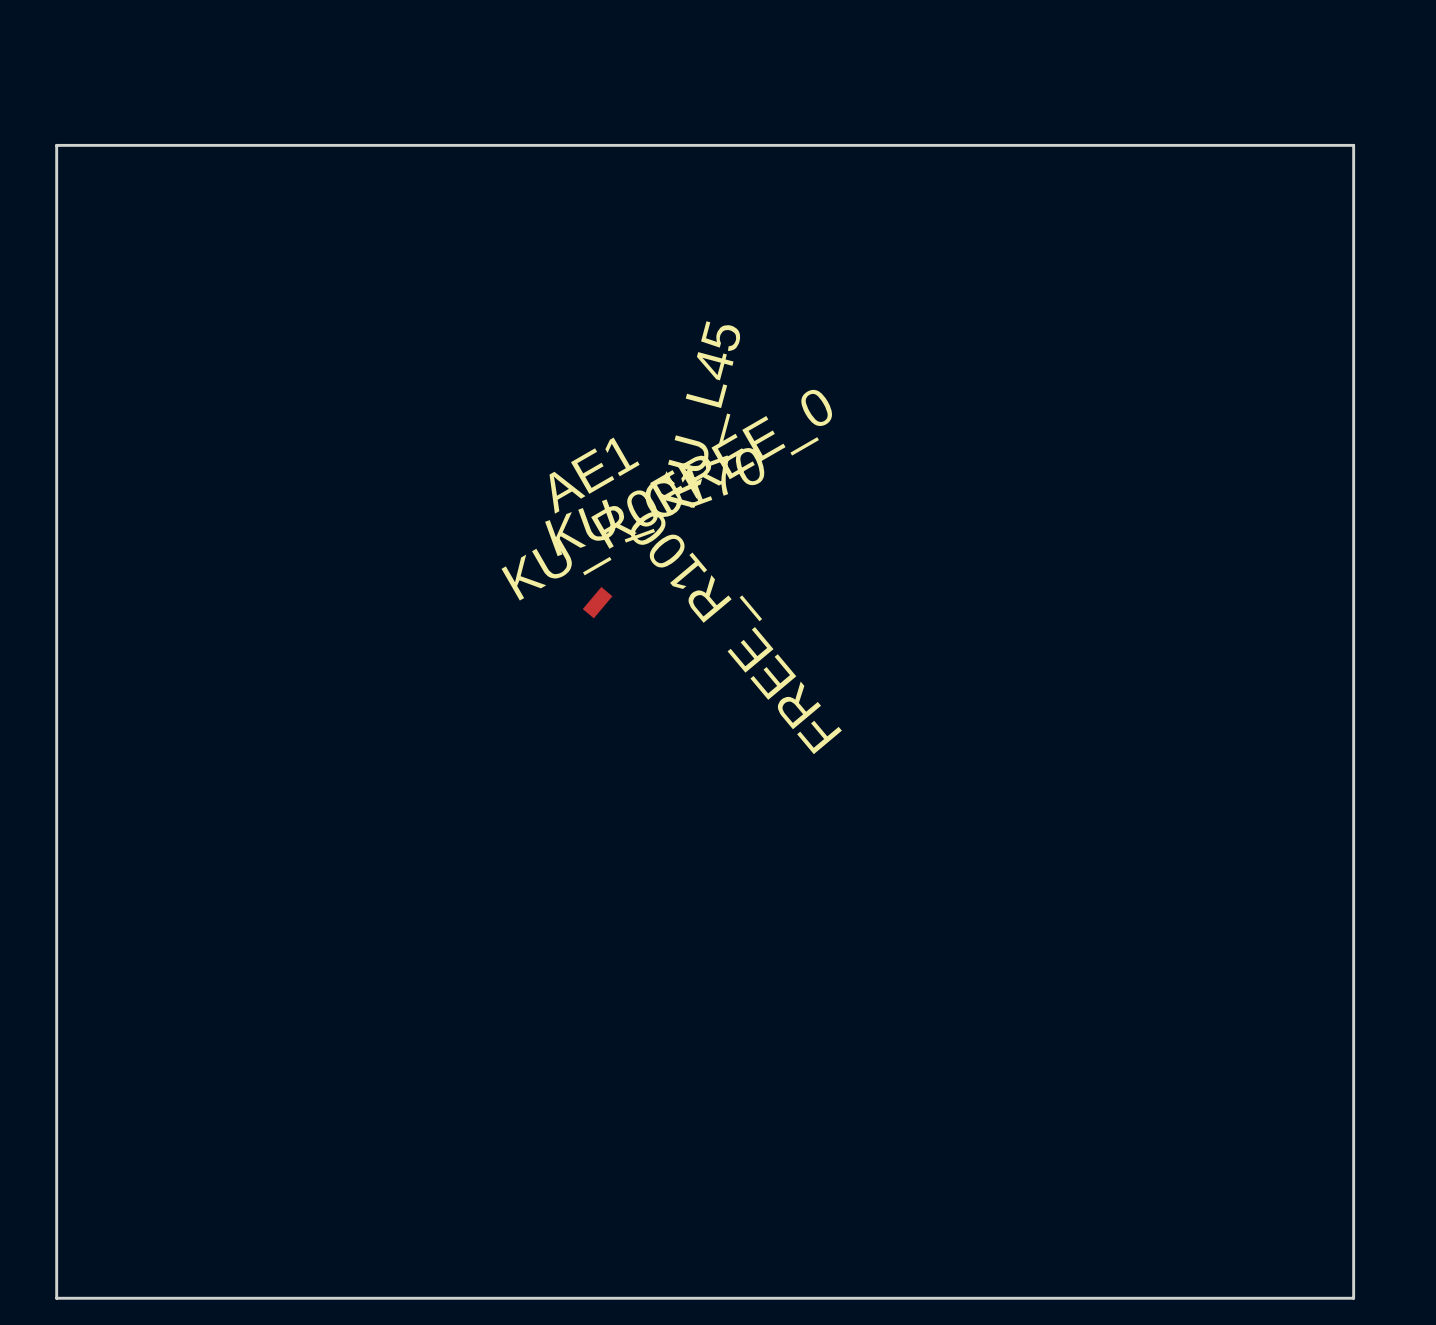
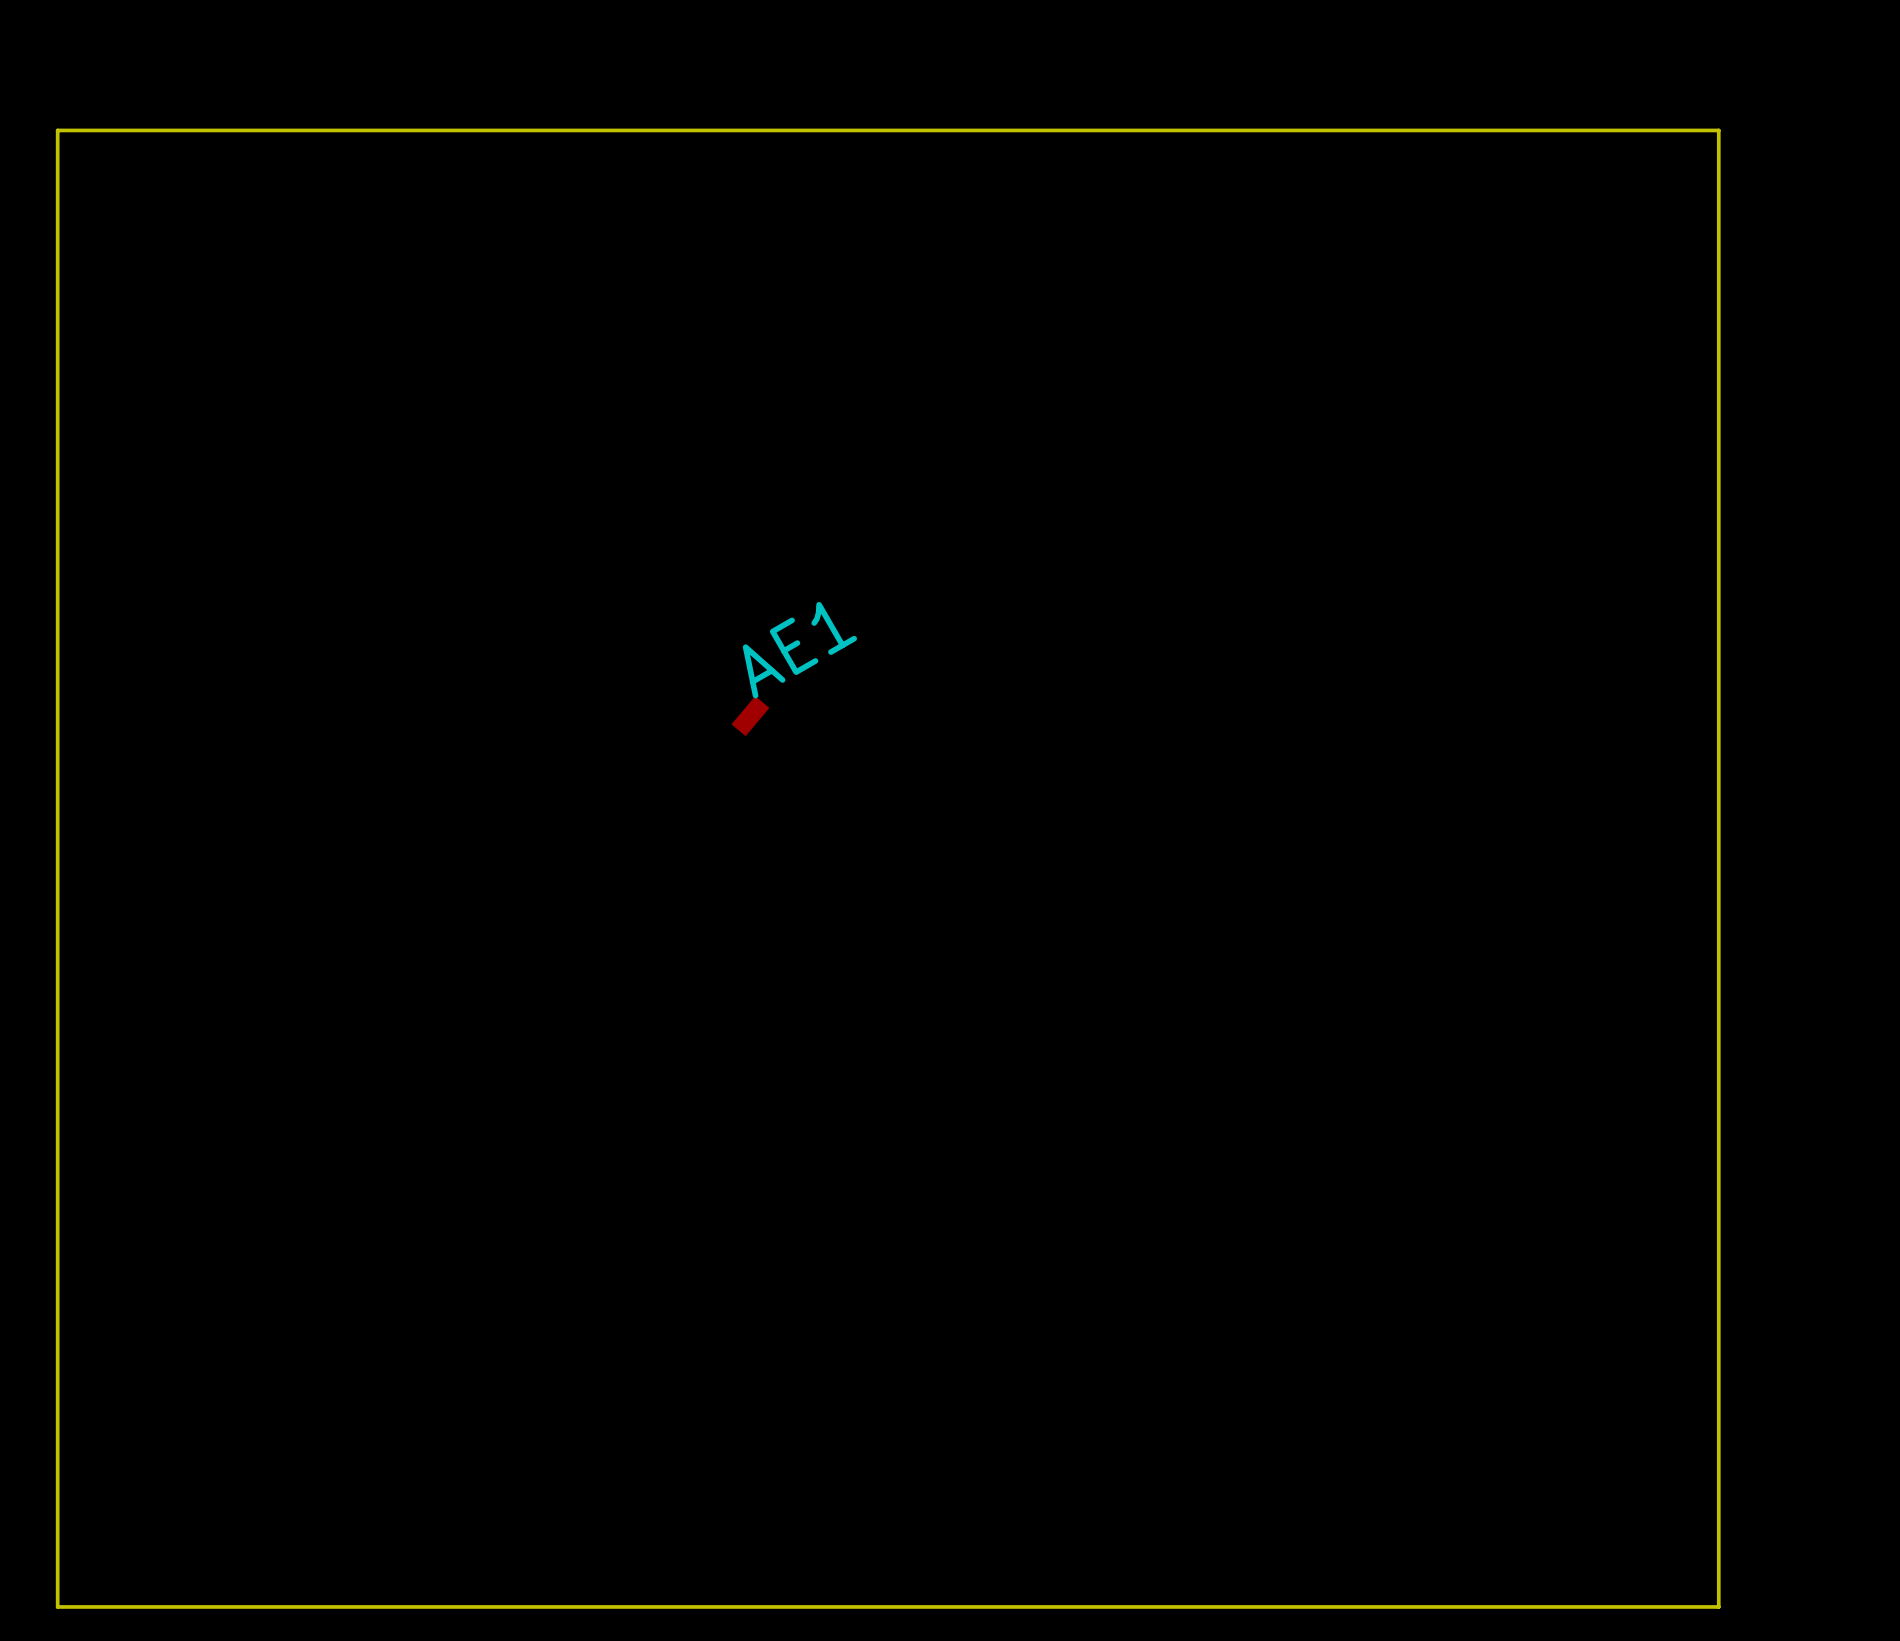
AE1 name position: AE1 (594, 475) -> AE1 (799, 650)
AE1 footprint: [582, 587, 613, 619] -> [731, 696, 770, 737]

